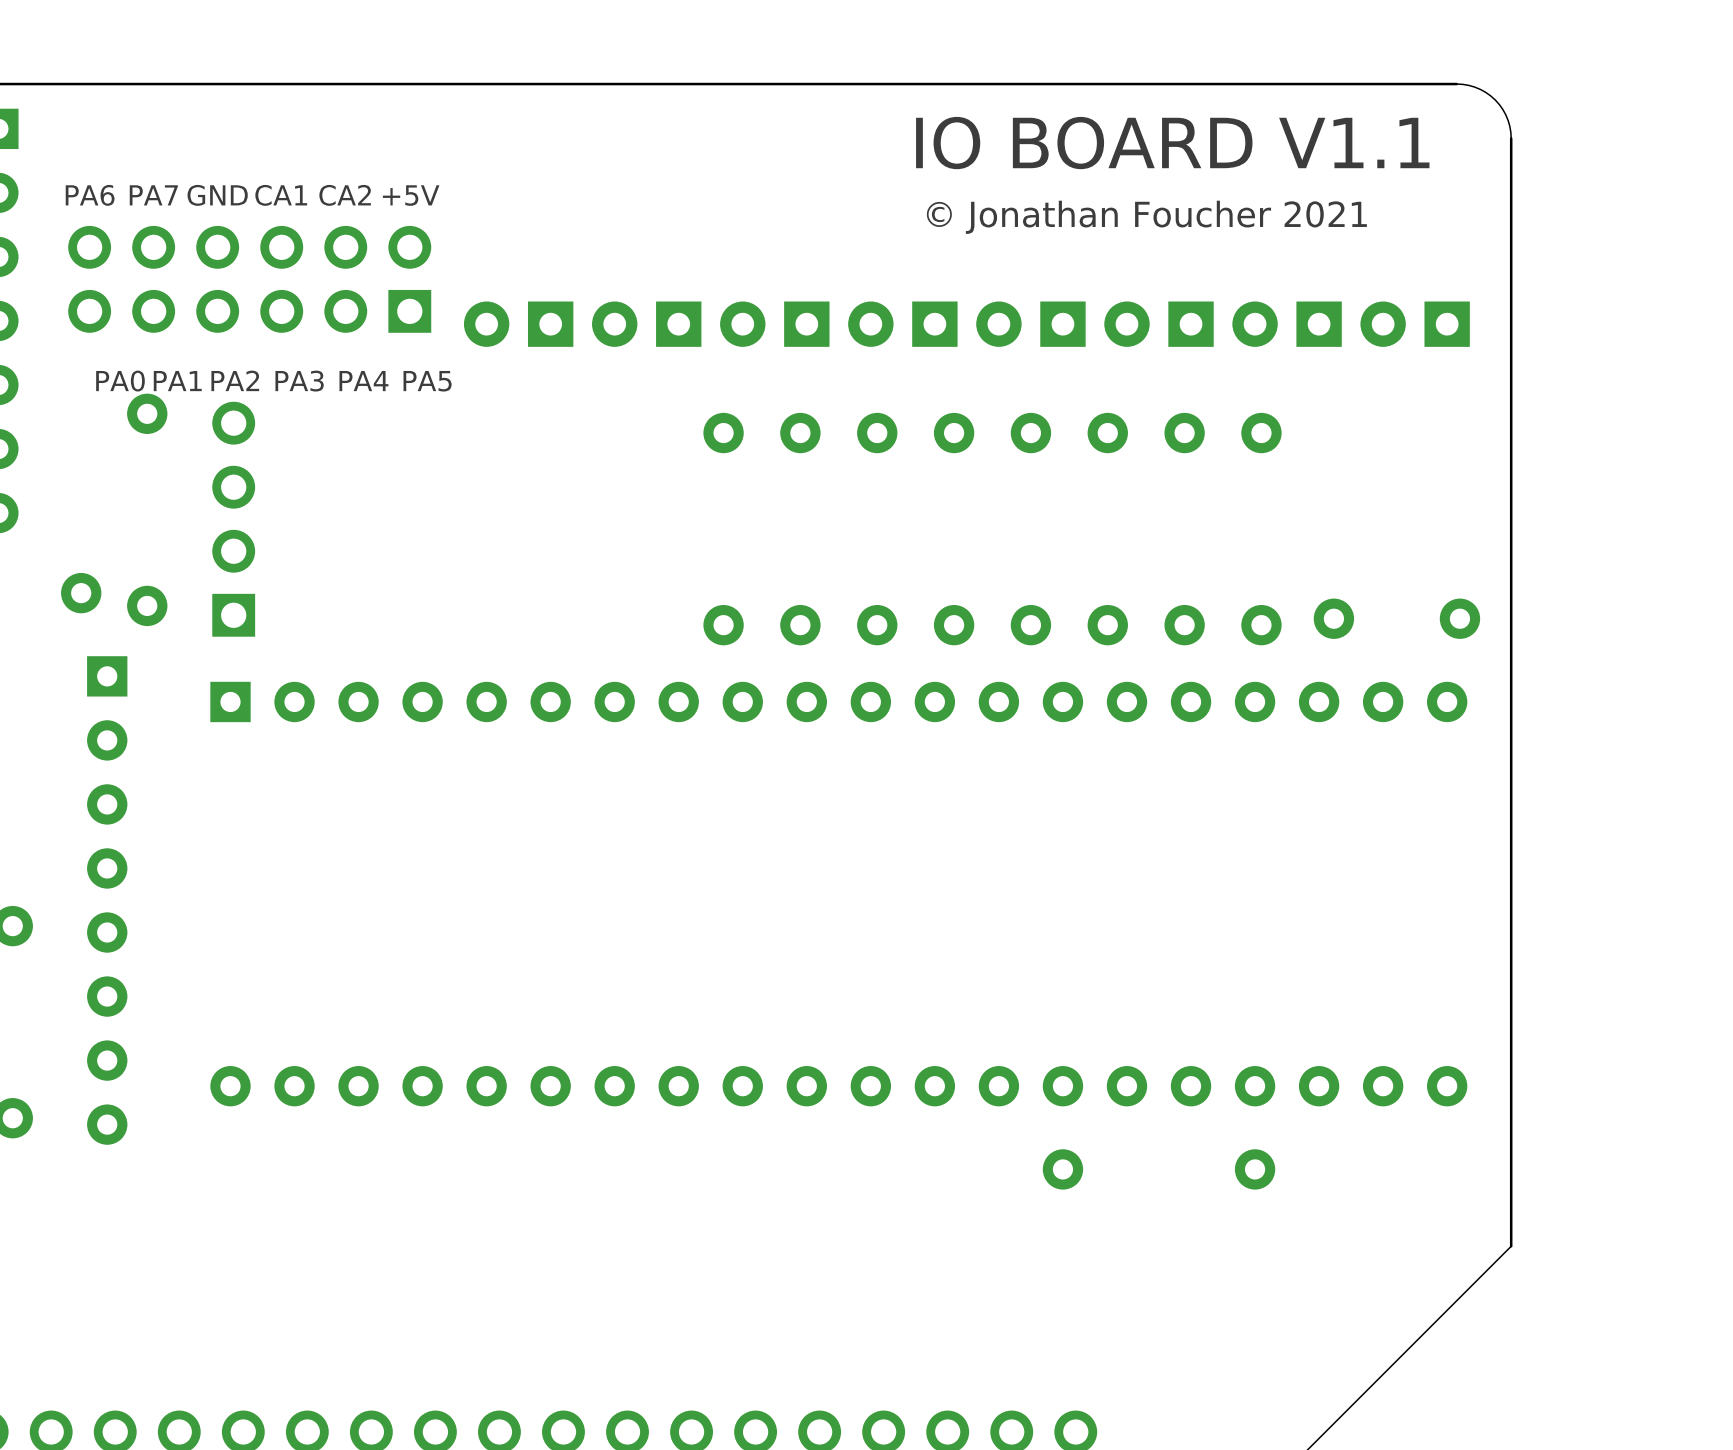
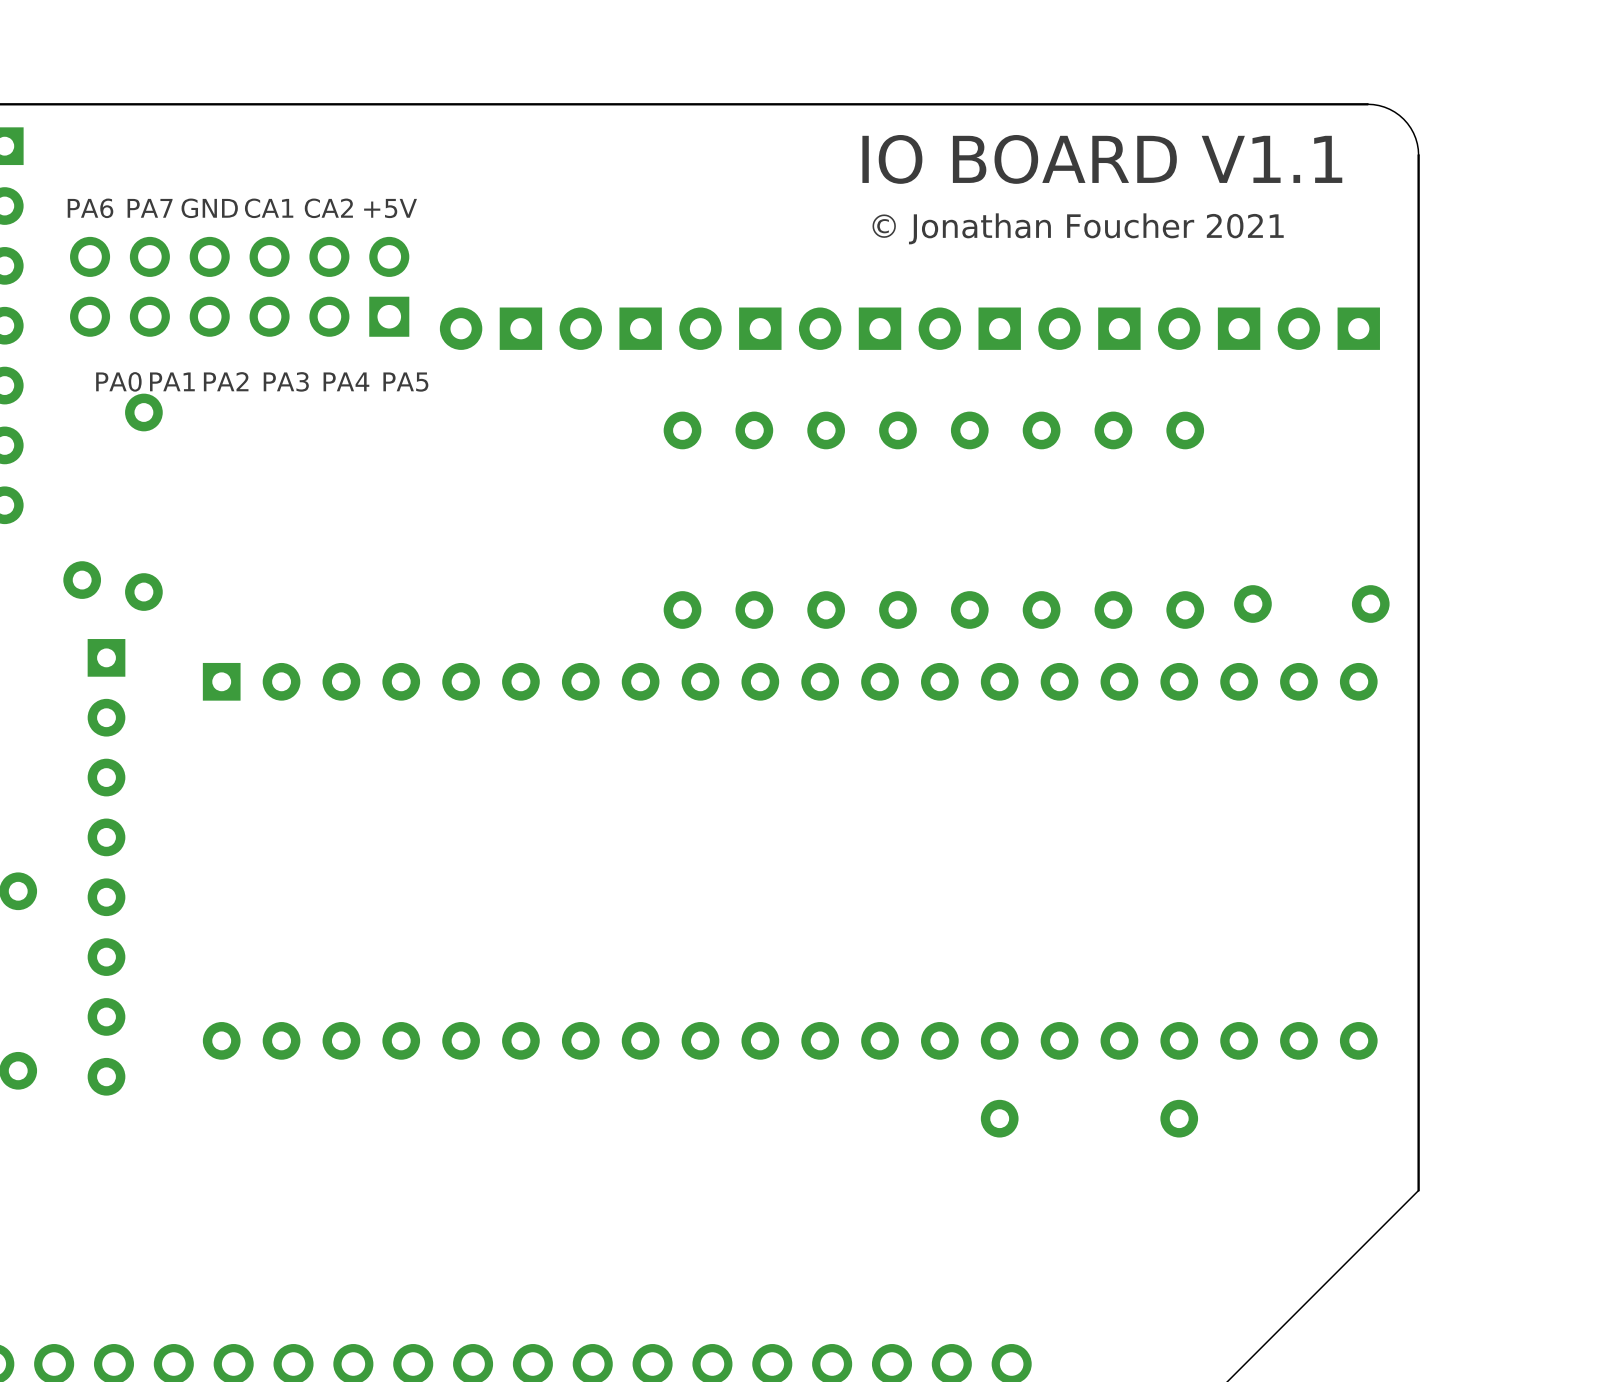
part: (233, 519) -> none

